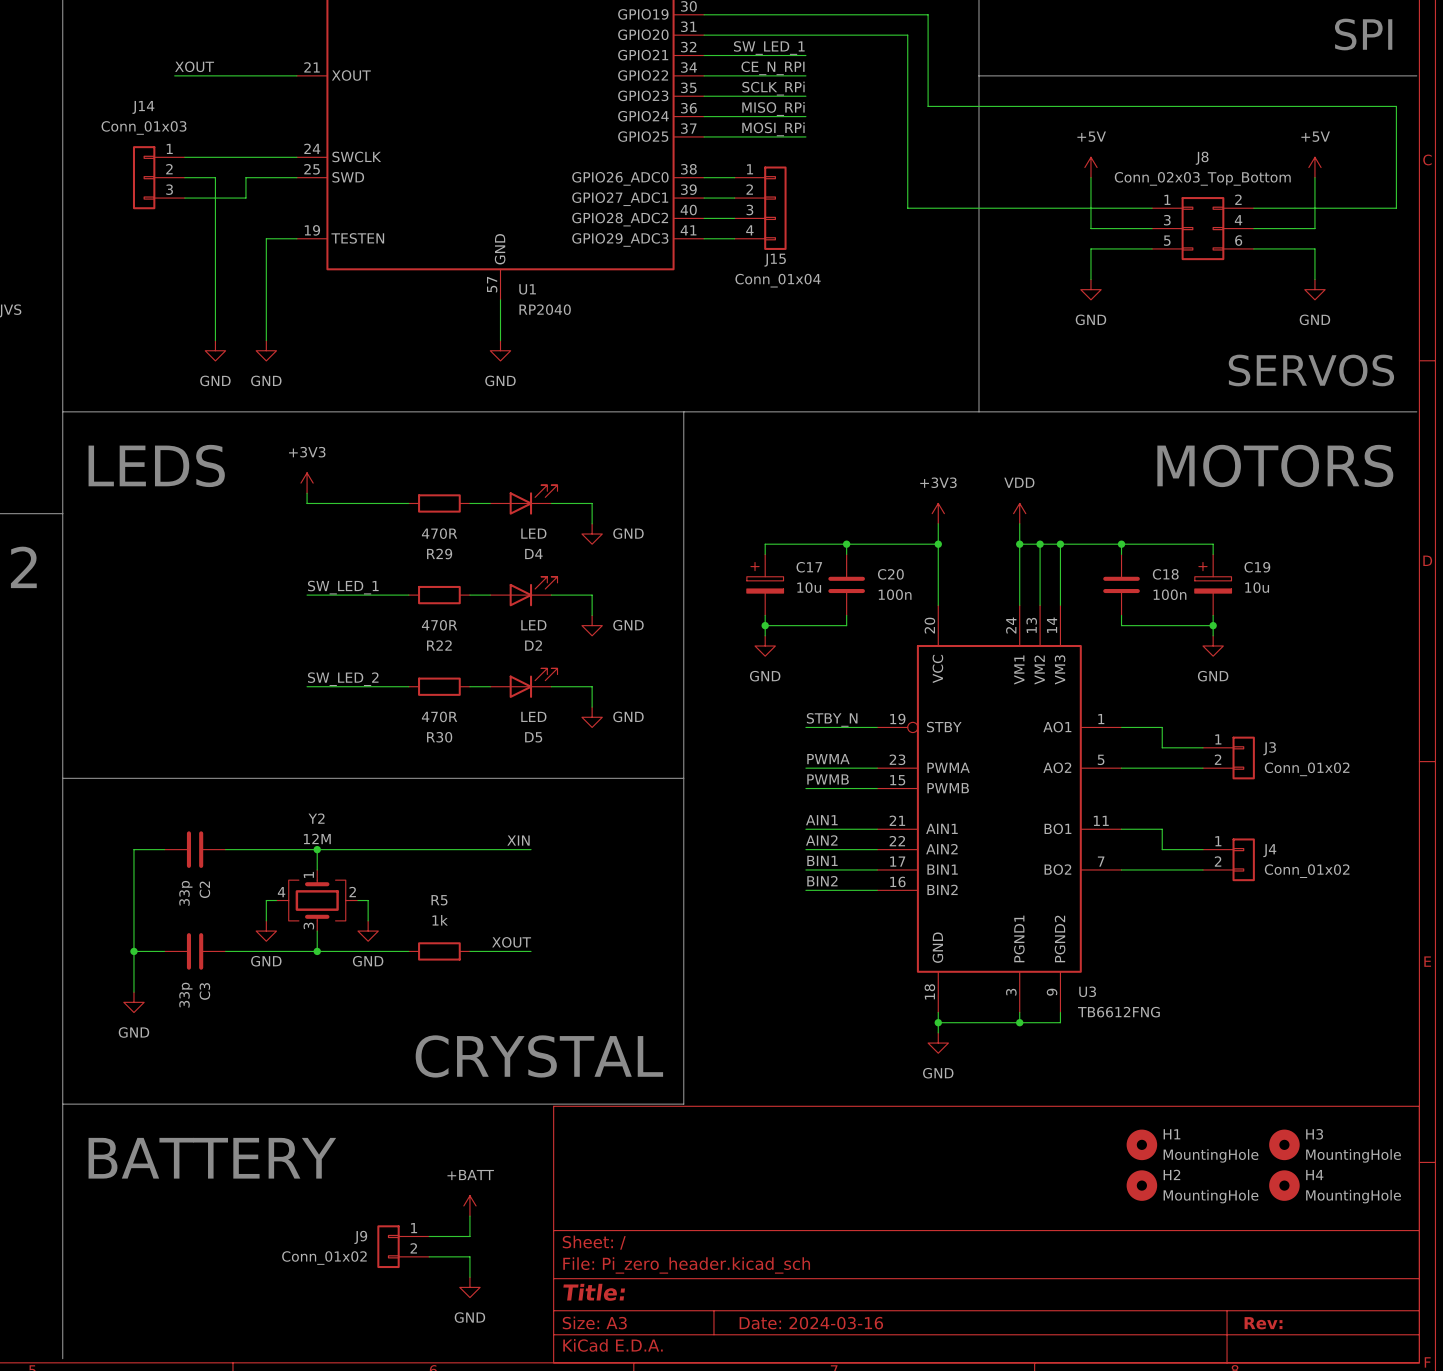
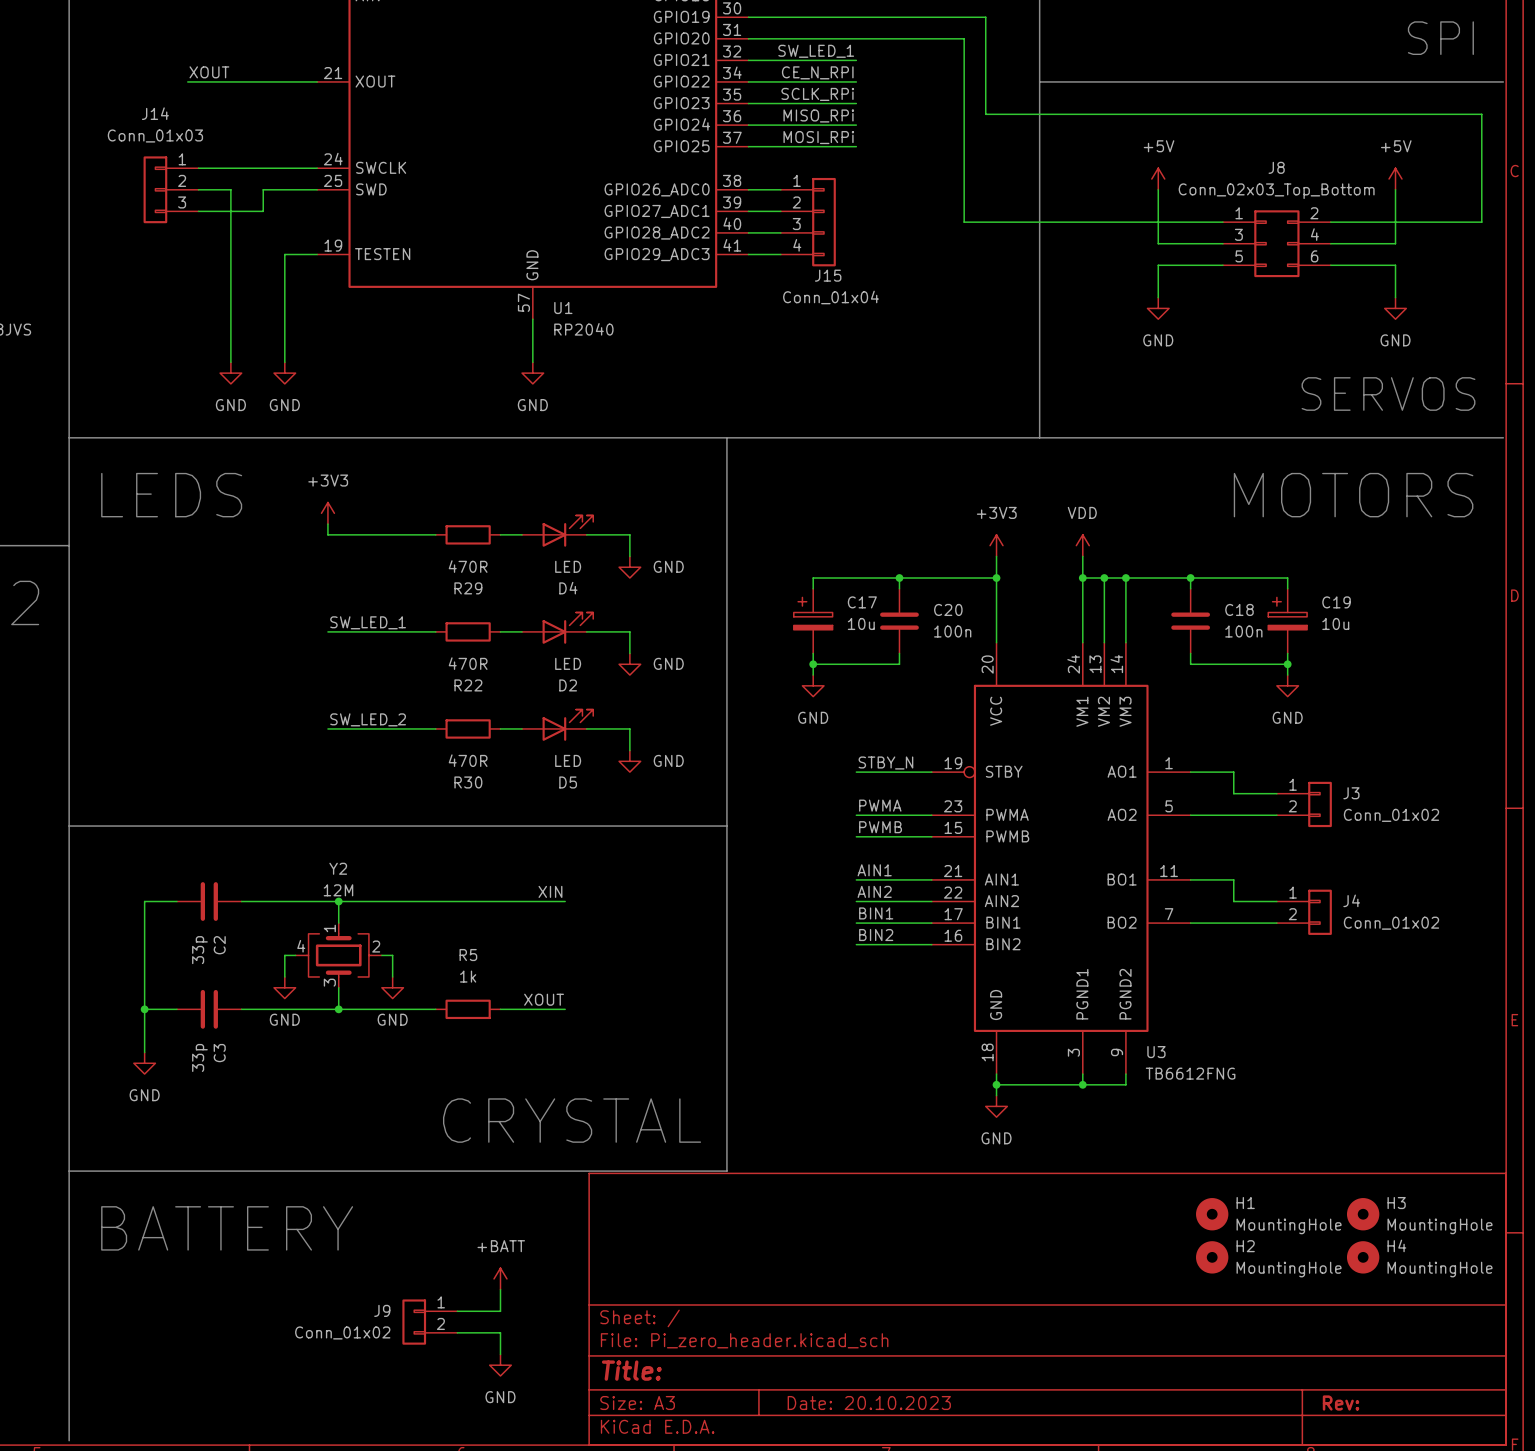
title block: Date: 2024-03-16 (811, 1323) -> Date: 20.10.2023 (869, 1403)

